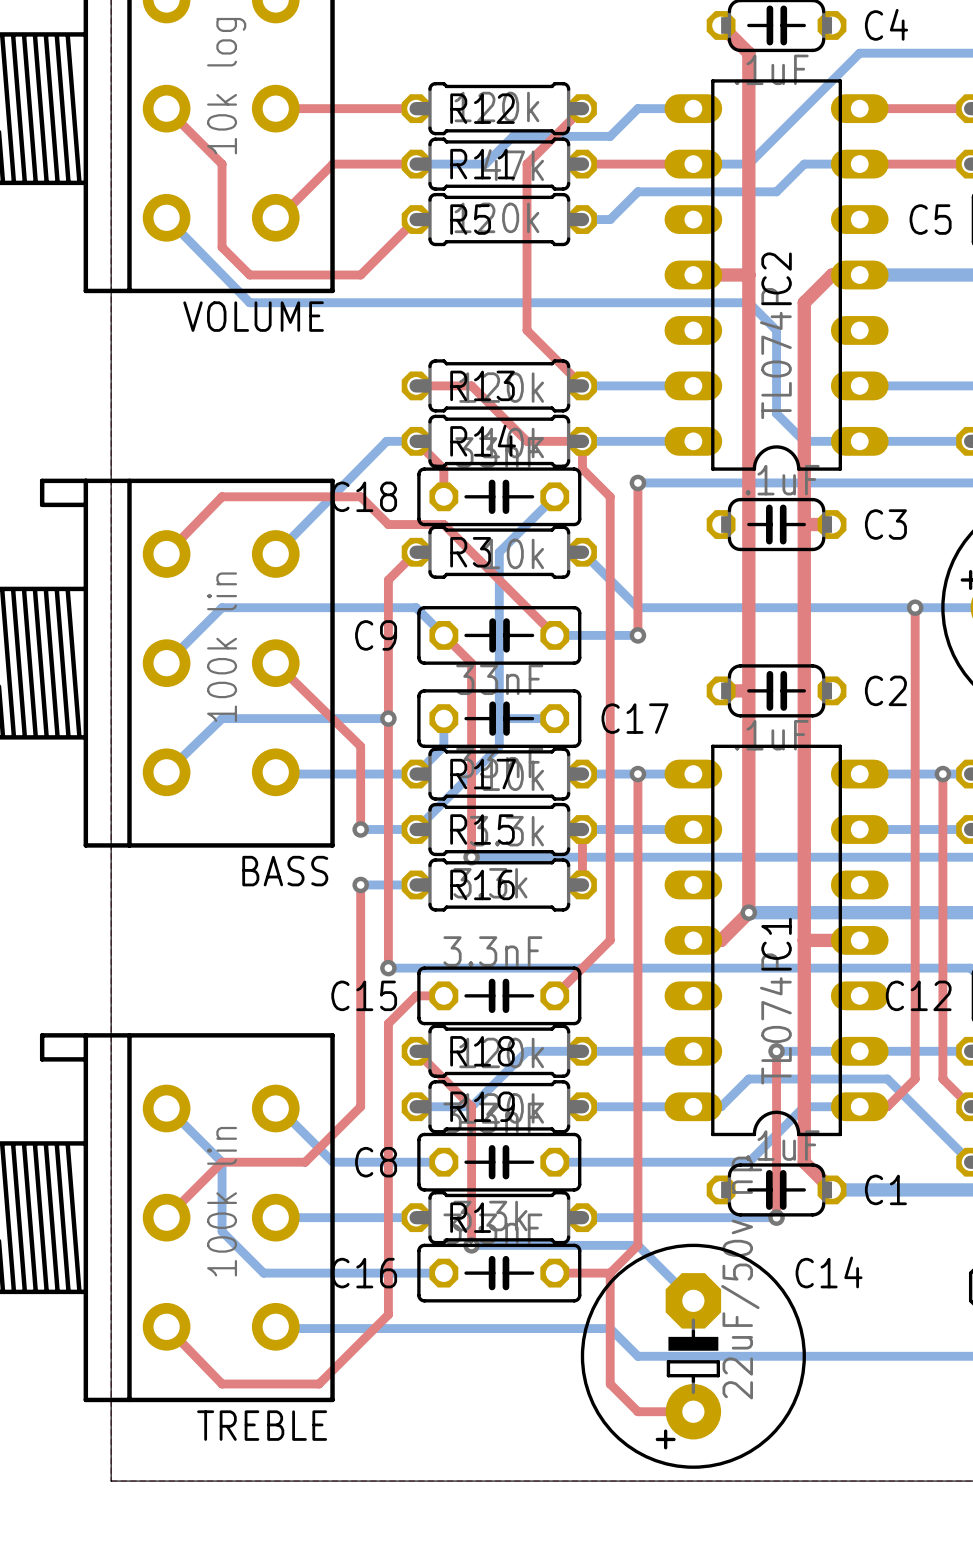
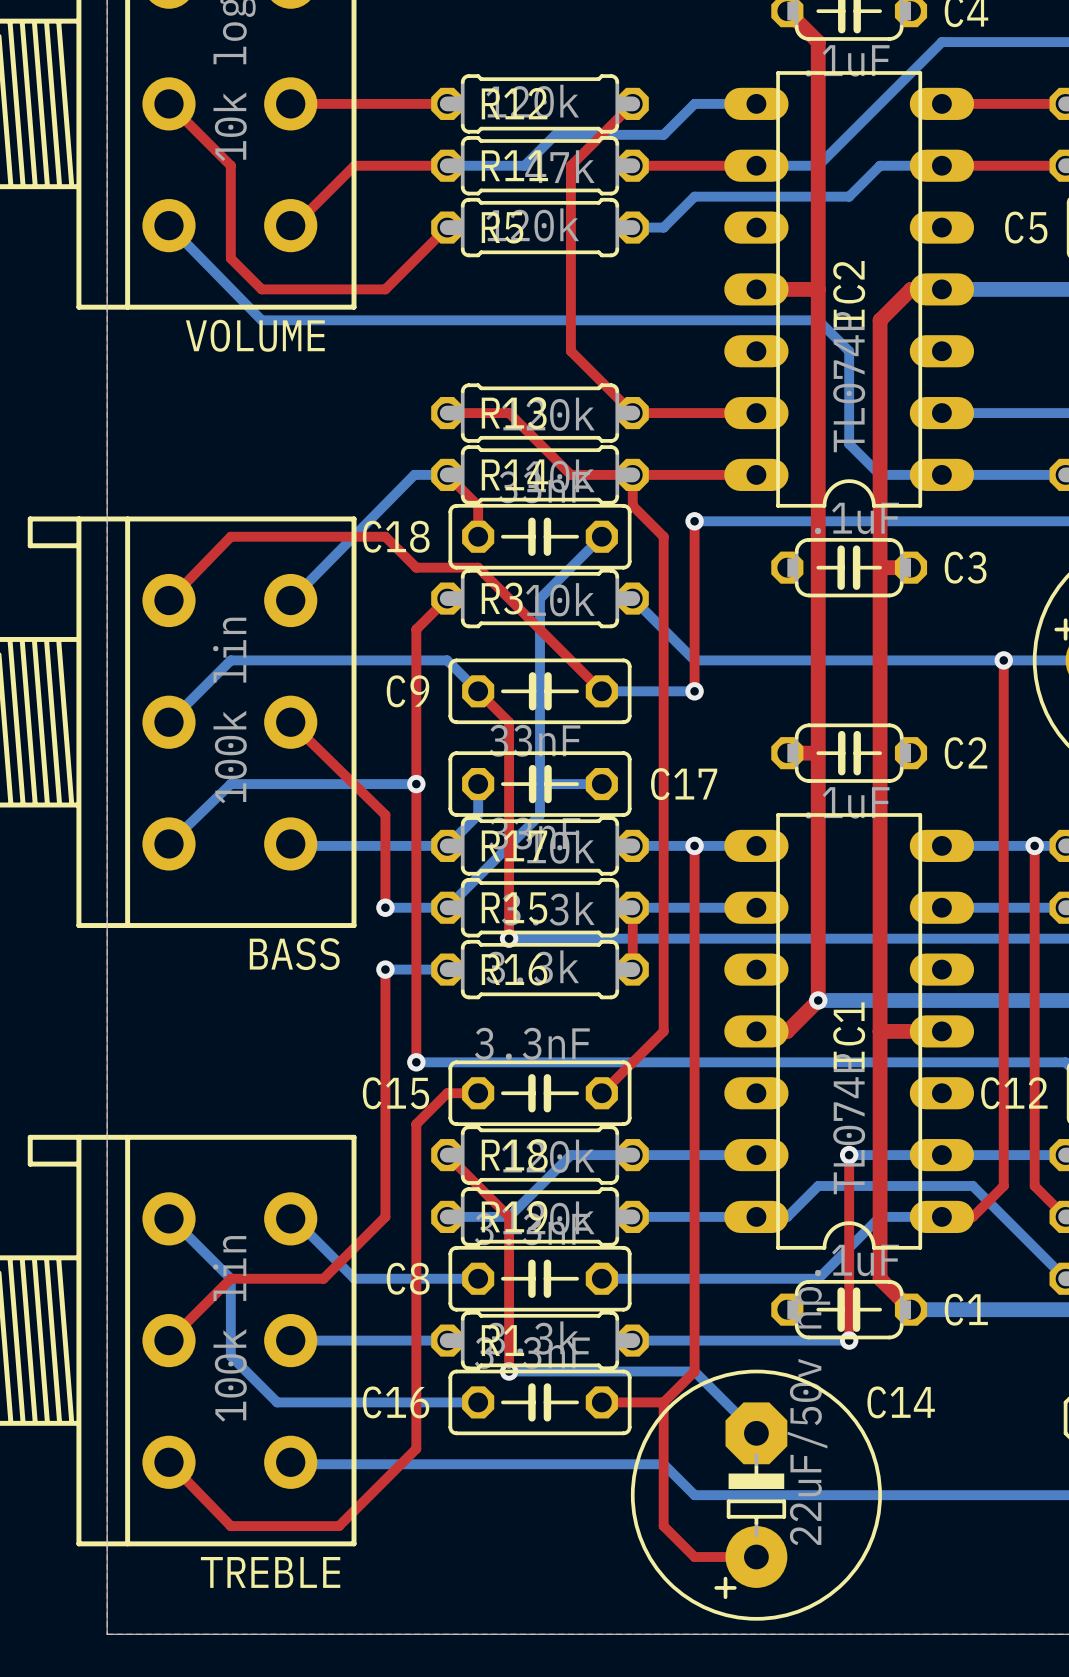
top track: none -> (632, 413) (756, 413)
bottom track: (582, 385) (693, 385) -> none
top track: none -> (632, 474) (756, 474)
bottom track: (582, 441) (693, 441) -> none

